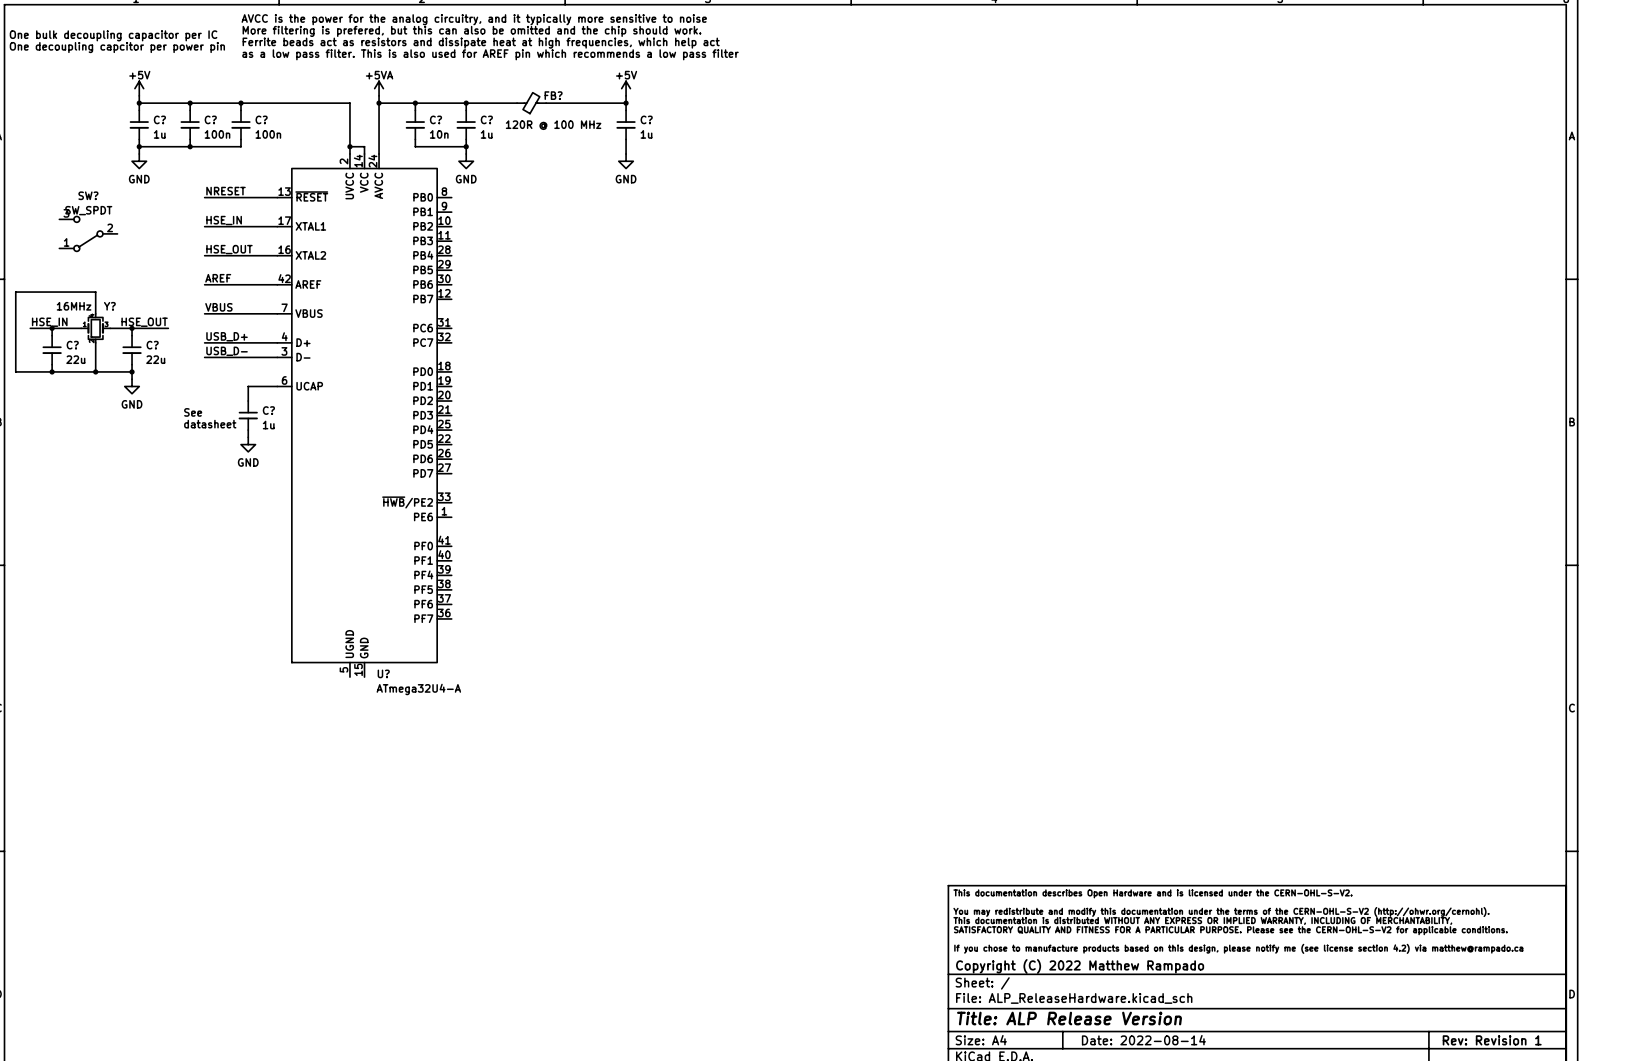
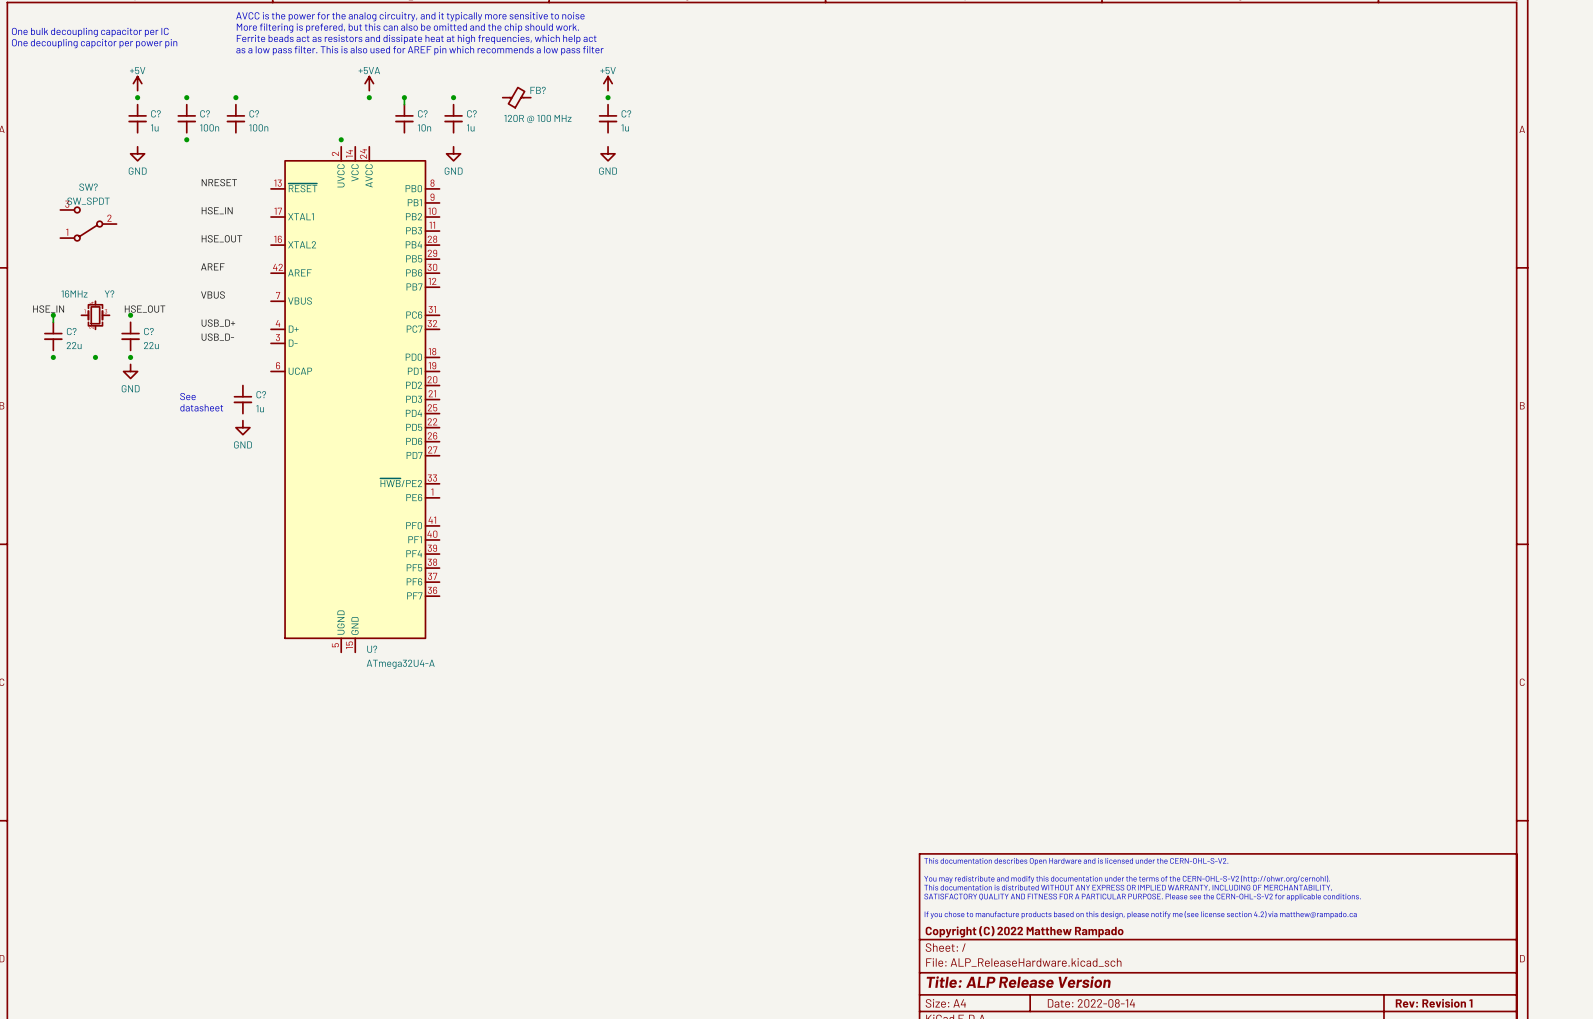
wire: (139, 95) (139, 110) -> none
wire: (379, 95) (379, 154) -> none
wire: (626, 95) (626, 110) -> none
wire: (139, 103) (349, 103) (349, 154) -> none
wire: (190, 103) (190, 110) -> none
wire: (240, 103) (240, 110) -> none
wire: (379, 103) (517, 103) -> none
wire: (466, 103) (466, 110) -> none
wire: (546, 103) (626, 103) -> none
wire: (139, 139) (139, 154) -> none
wire: (190, 139) (190, 146) -> none
wire: (240, 139) (240, 146) (139, 146) -> none
wire: (415, 139) (415, 146) (466, 146) -> none
wire: (466, 139) (466, 154) -> none
wire: (626, 139) (626, 154) -> none
junction: (139, 146) -> none
wire: (349, 146) (364, 146) (364, 154) -> none
junction: (466, 146) -> none
wire: (204, 197) (277, 197) -> none
wire: (204, 226) (277, 226) -> none
wire: (204, 255) (277, 255) -> none
wire: (204, 284) (277, 284) -> none
wire: (95, 313) (95, 292) (15, 292) (15, 371) (132, 371) -> none
wire: (204, 313) (277, 313) -> none
wire: (30, 328) (81, 328) -> none
wire: (110, 328) (168, 328) -> none
wire: (132, 328) (132, 335) -> none
wire: (95, 342) (95, 371) -> none
wire: (204, 342) (277, 342) -> none
wire: (204, 357) (277, 357) -> none
wire: (52, 364) (52, 371) -> none
wire: (132, 364) (132, 379) -> none
wire: (277, 386) (248, 386) (248, 401) -> none
wire: (248, 430) (248, 437) -> none

